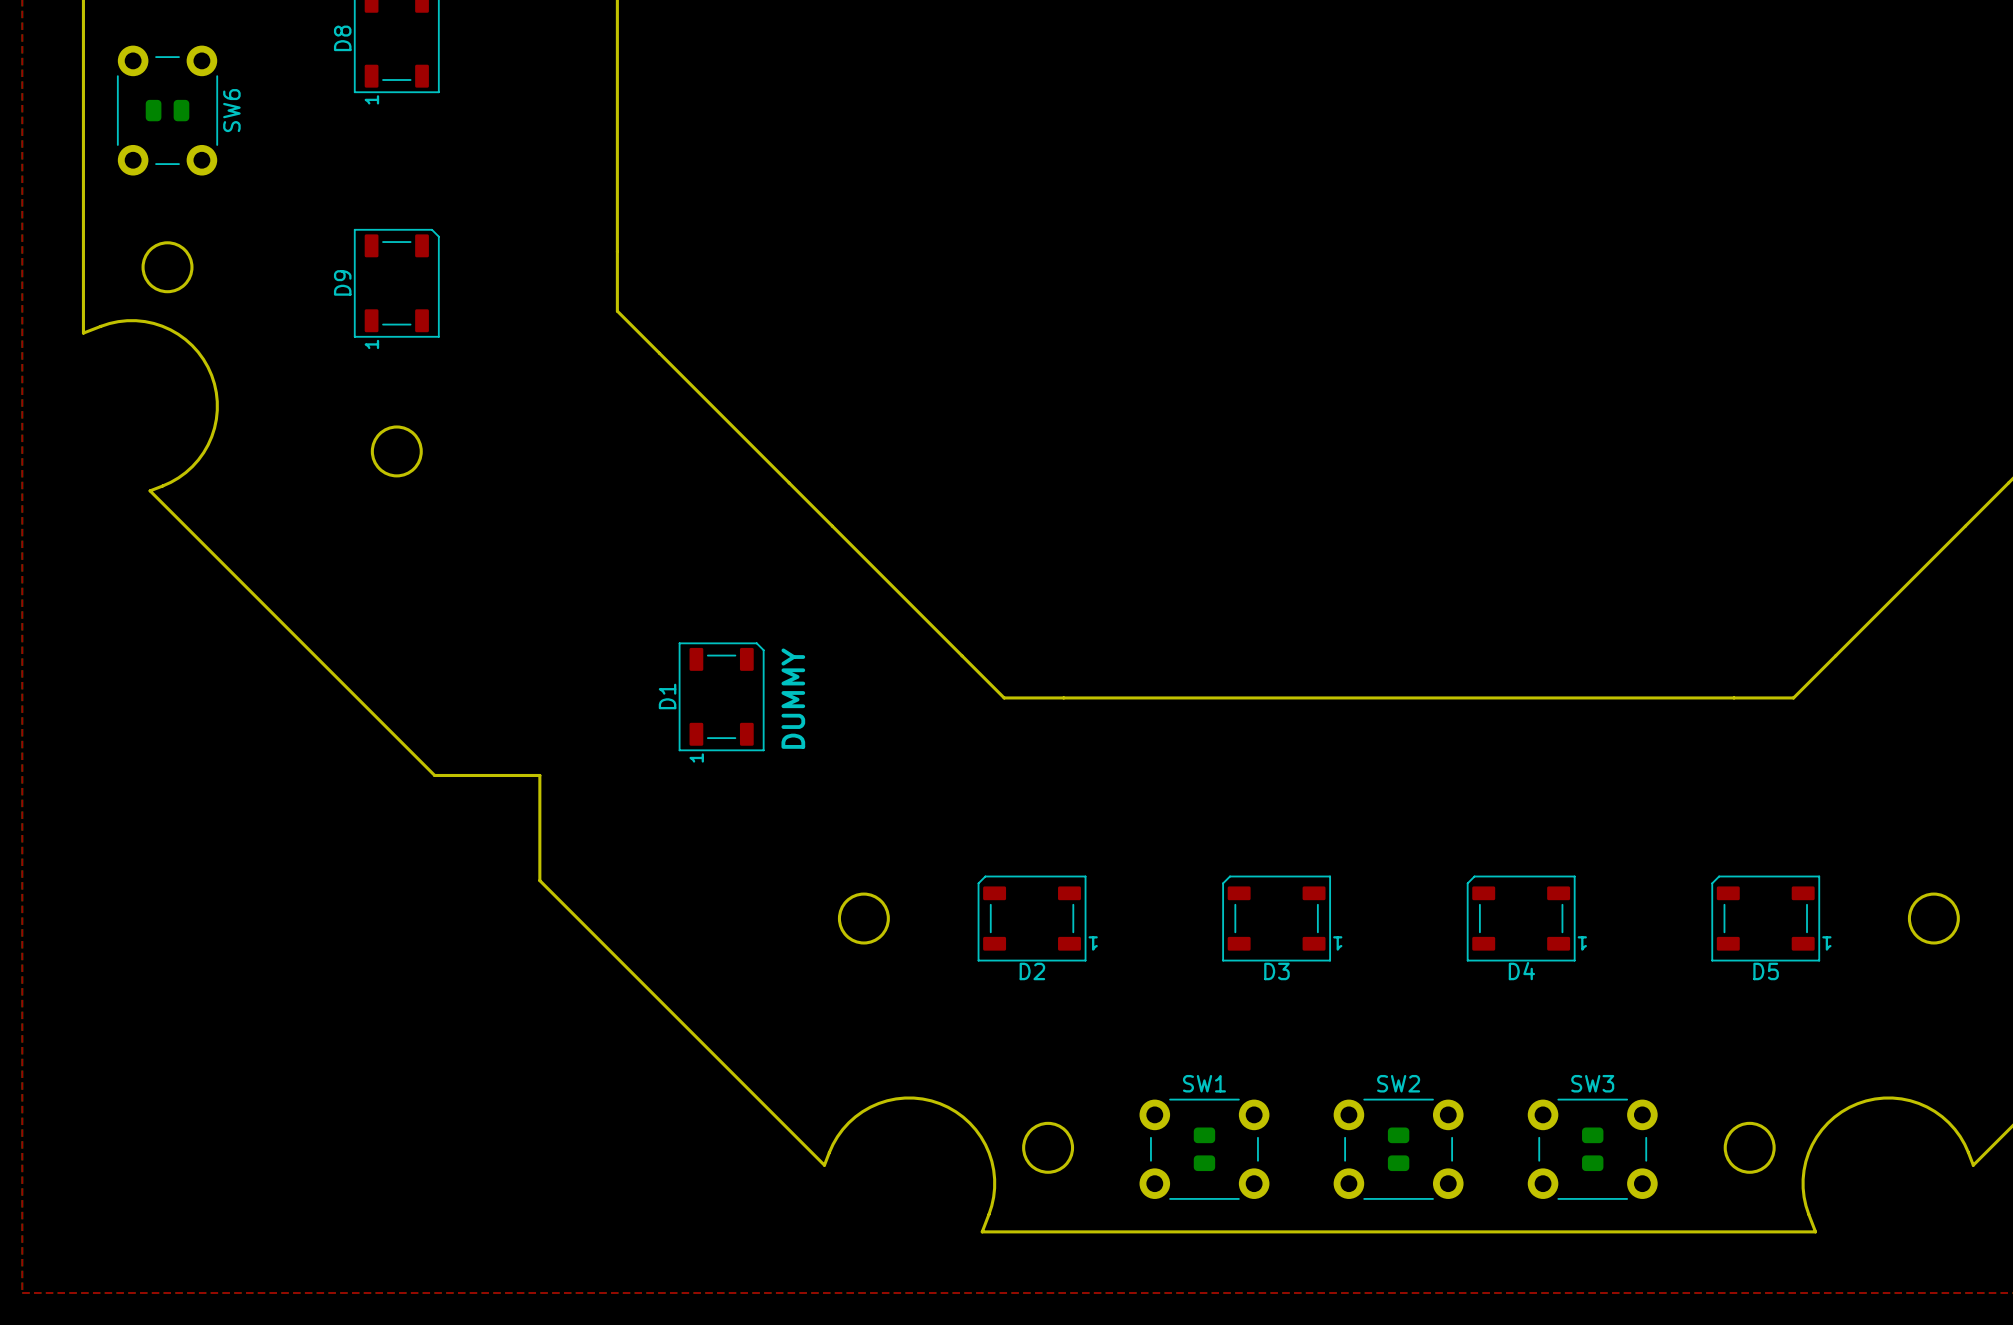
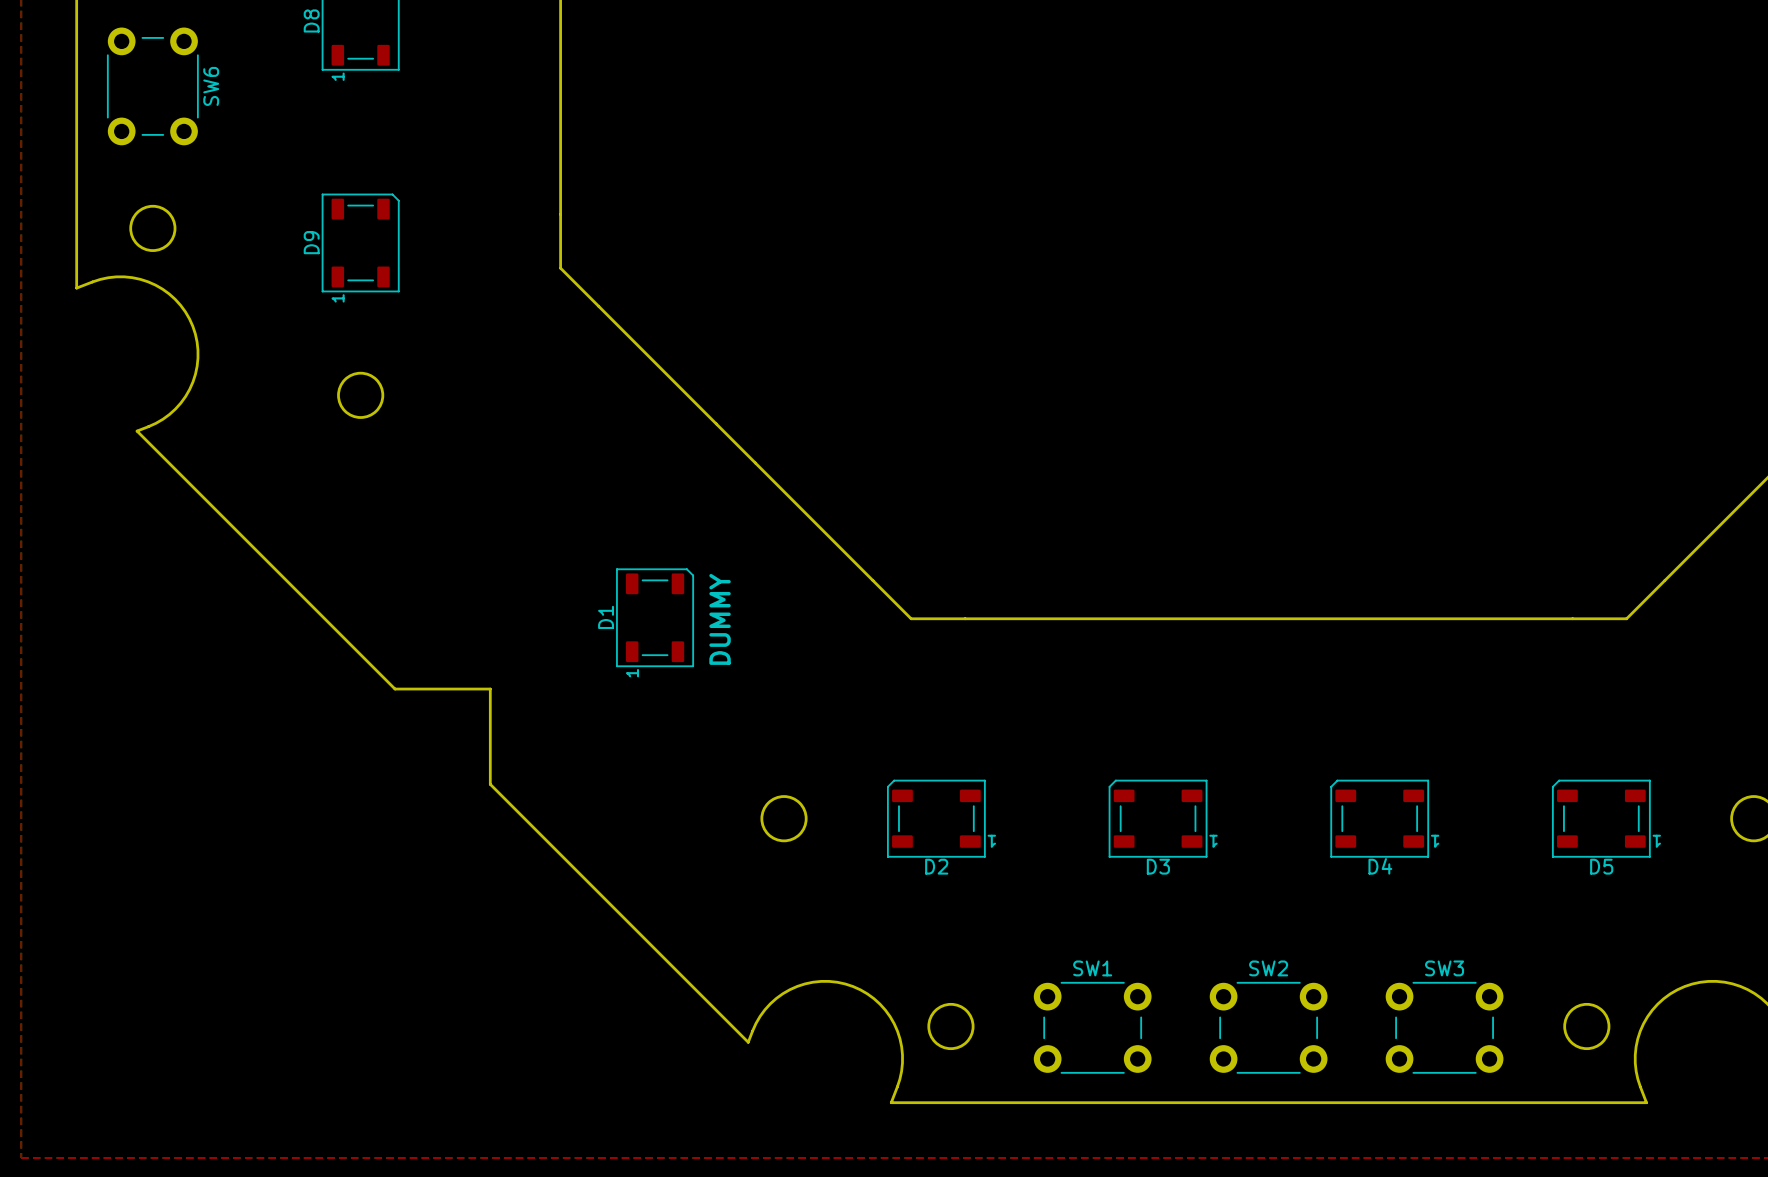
part: (167, 110) -> none
part: (1204, 1149) -> none
part: (1398, 1149) -> none
part: (1592, 1149) -> none

